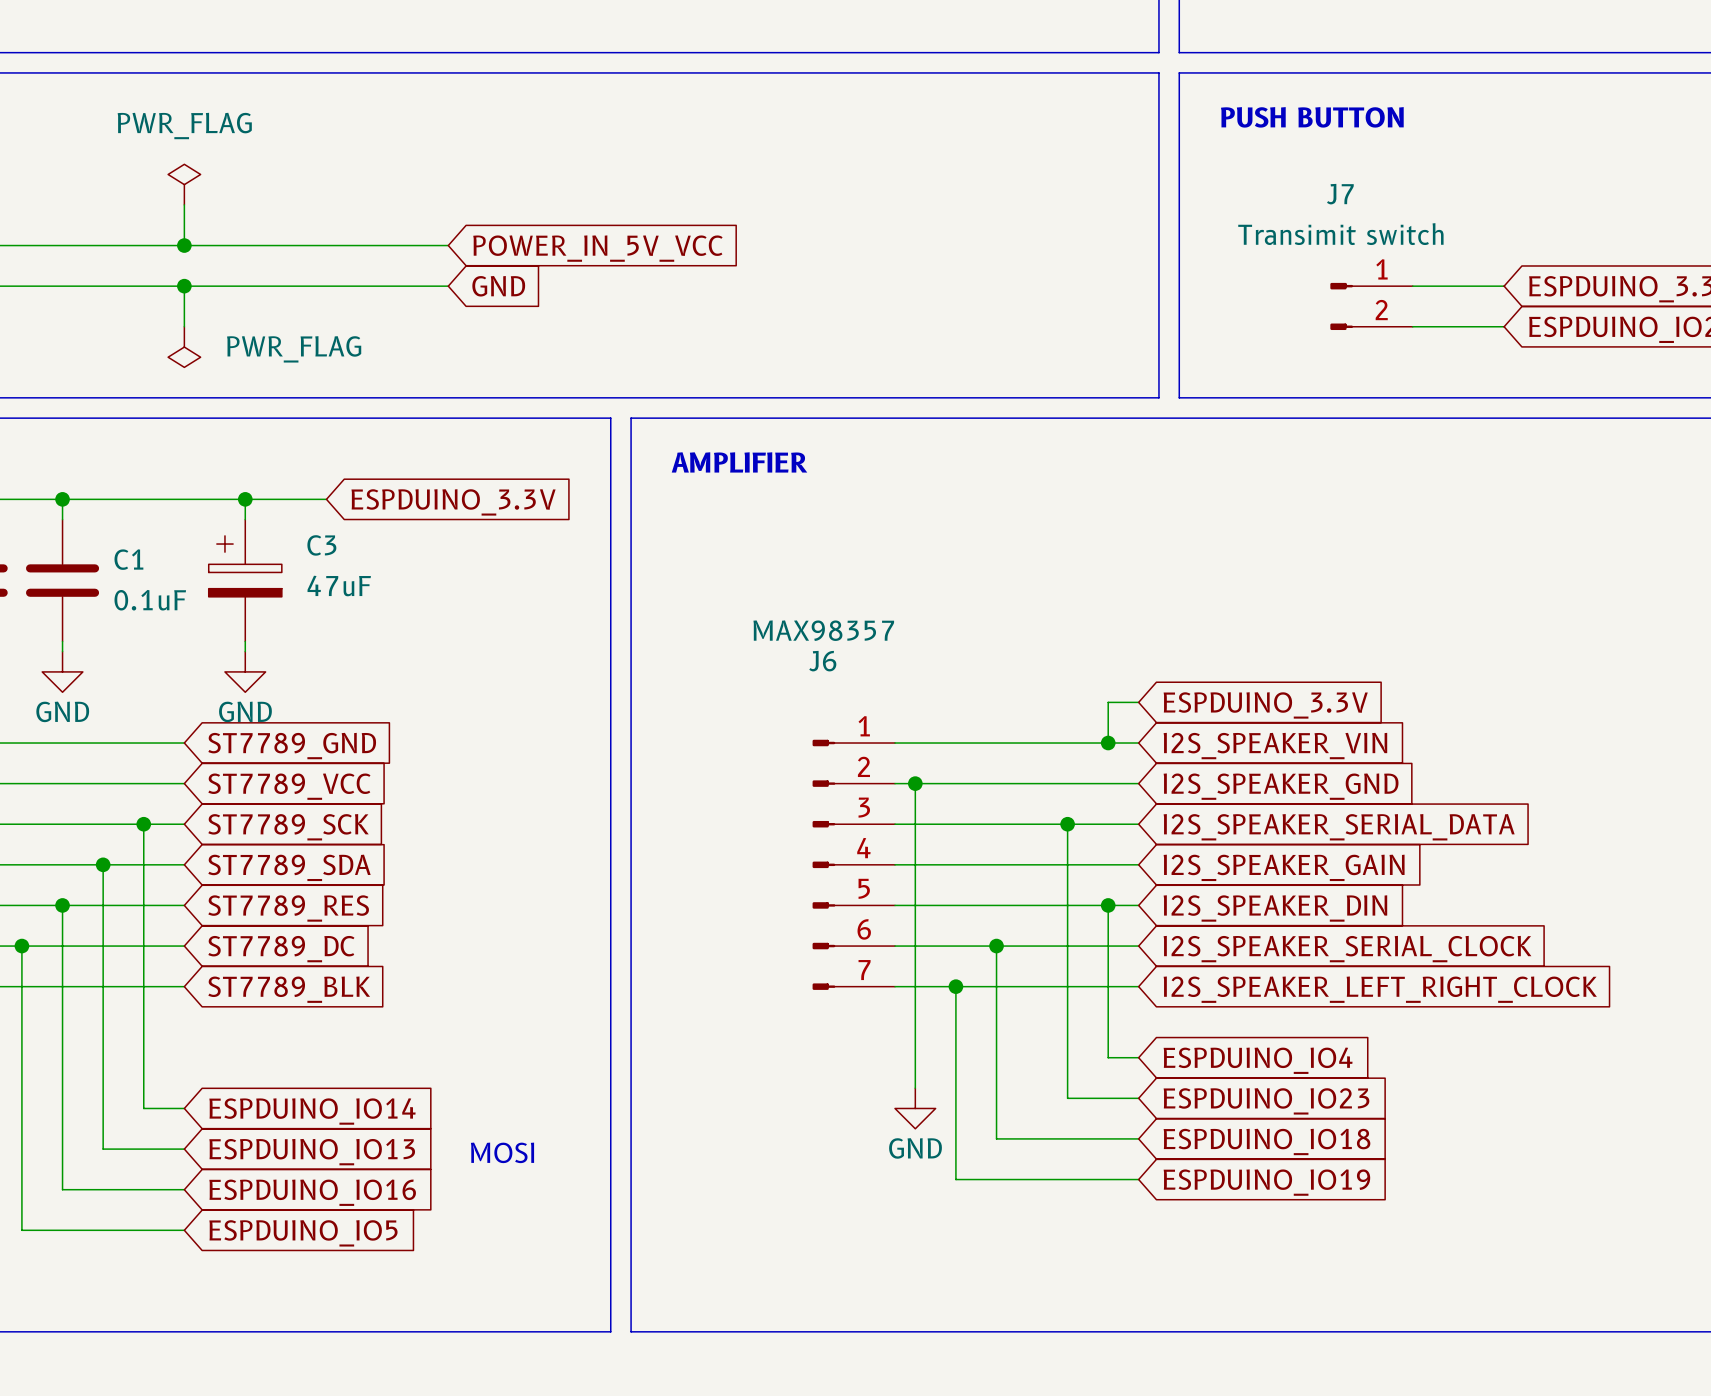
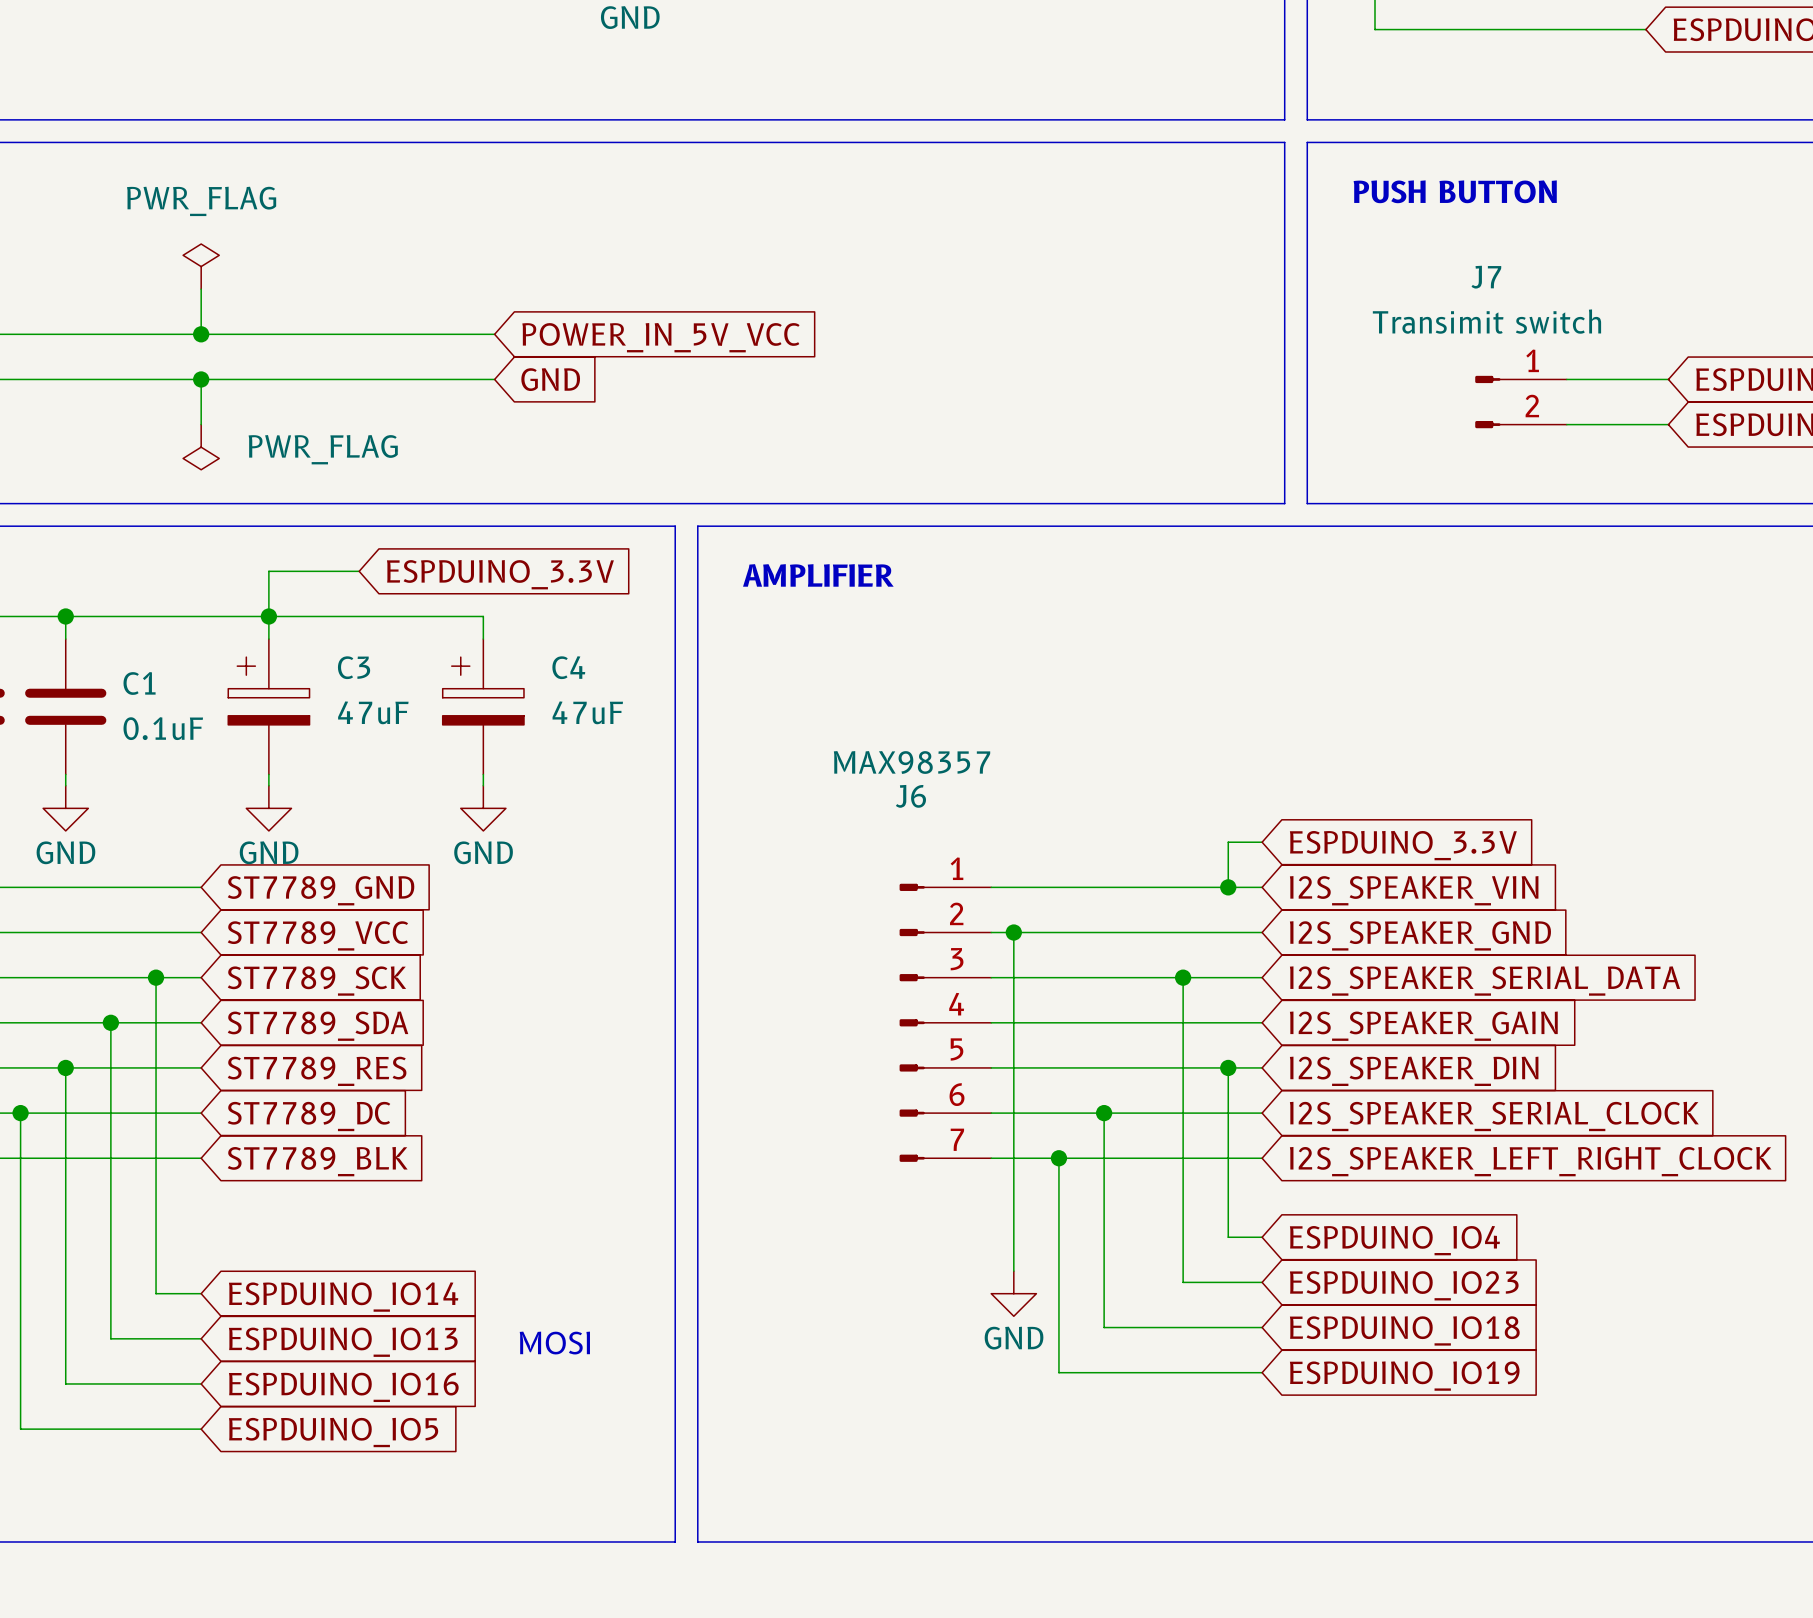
wire: none -> (359, 571) (268, 571) (268, 616)
wire: none -> (359, 616) (483, 616) (483, 639)
global label position: ESPDUINO_3.3V (453, 502) -> ESPDUINO_3.3V (500, 574)
C4: none -> 47uF (483, 706)
wire: none -> (483, 774) (483, 785)
power symbol: none -> GND (483, 808)

